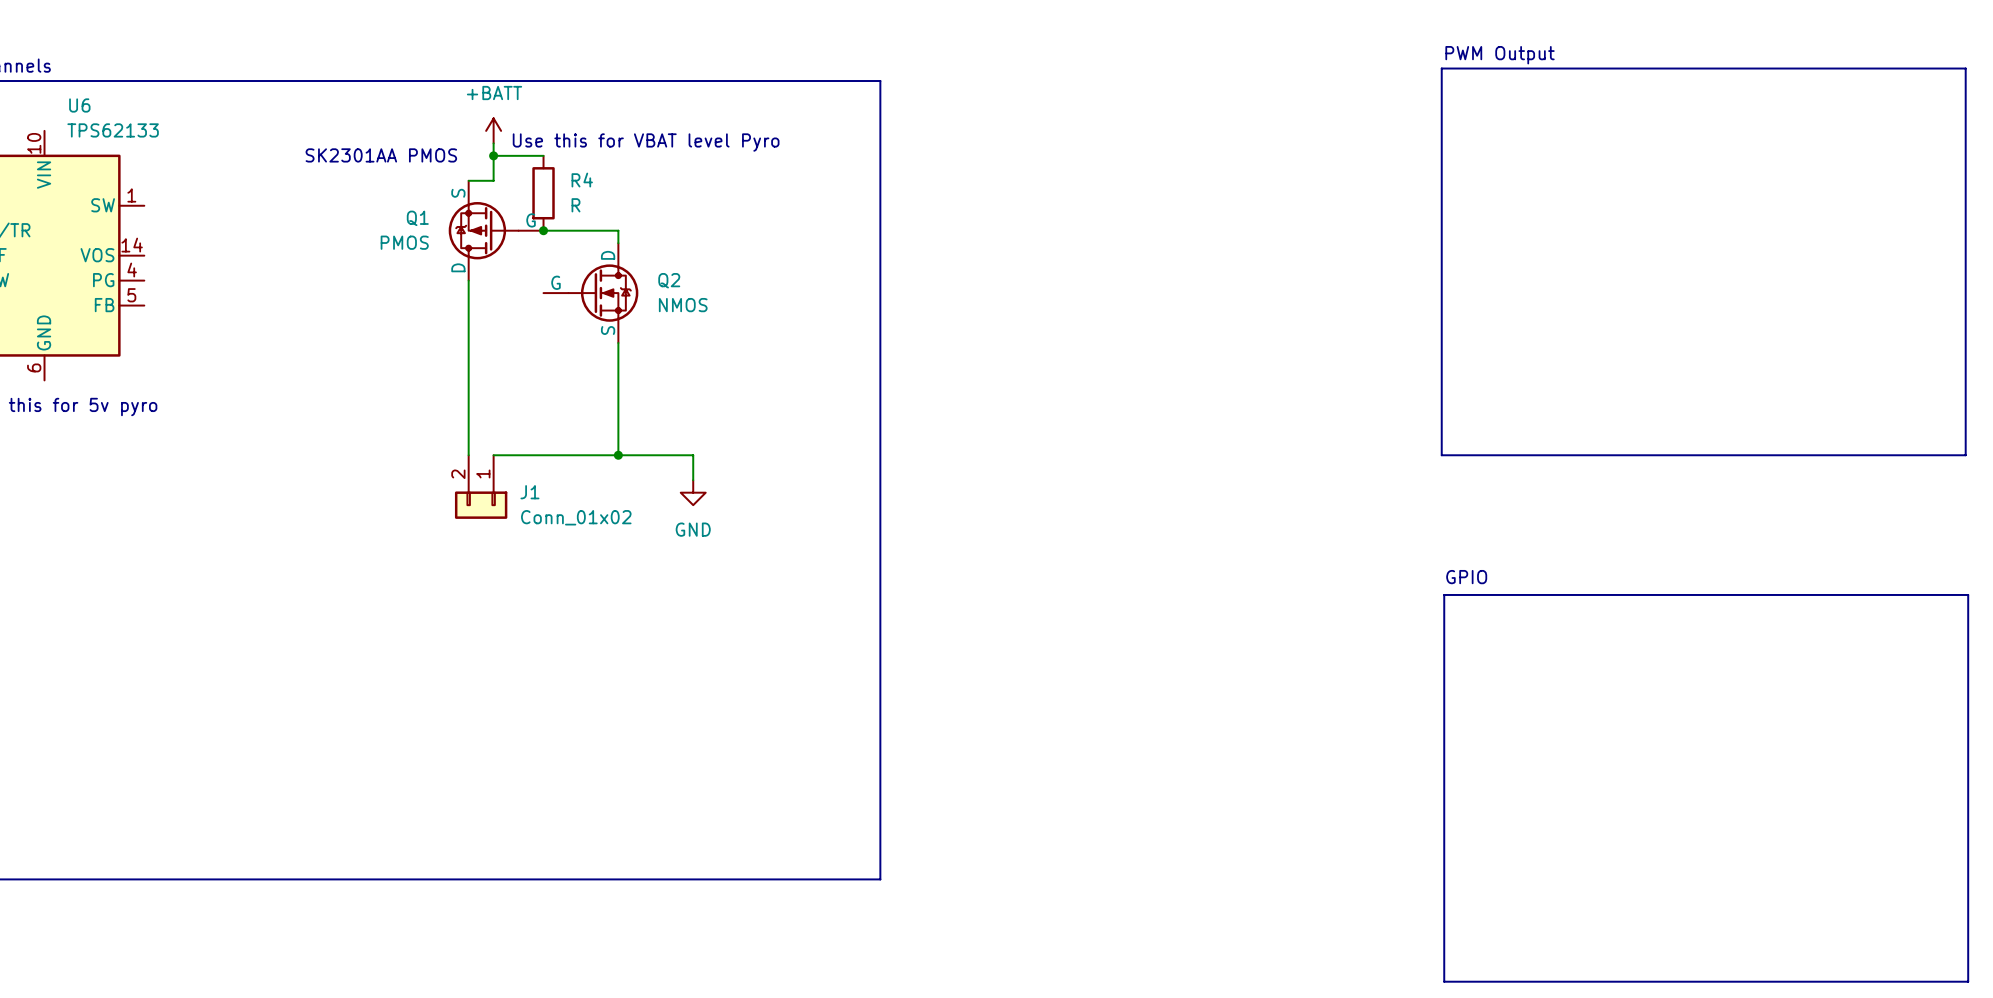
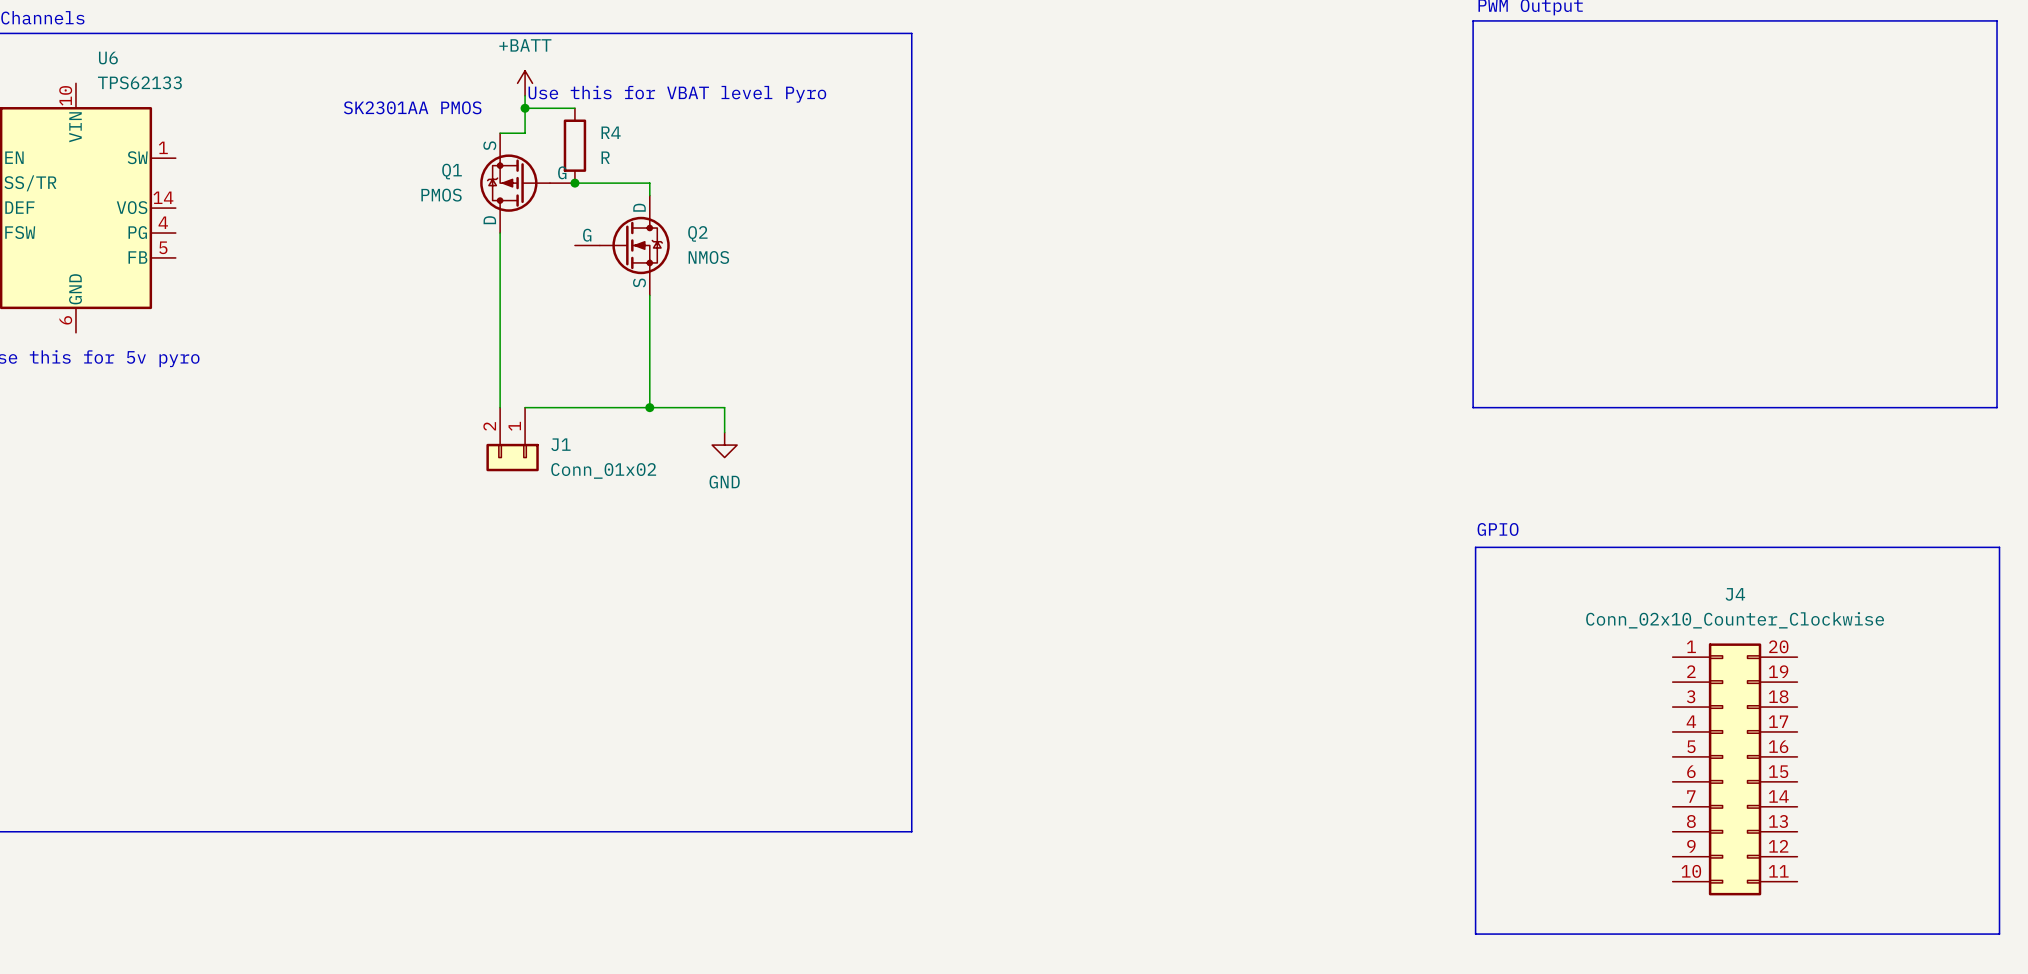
J4: none -> Conn_02x10_Counter_Clockwise (1735, 769)

